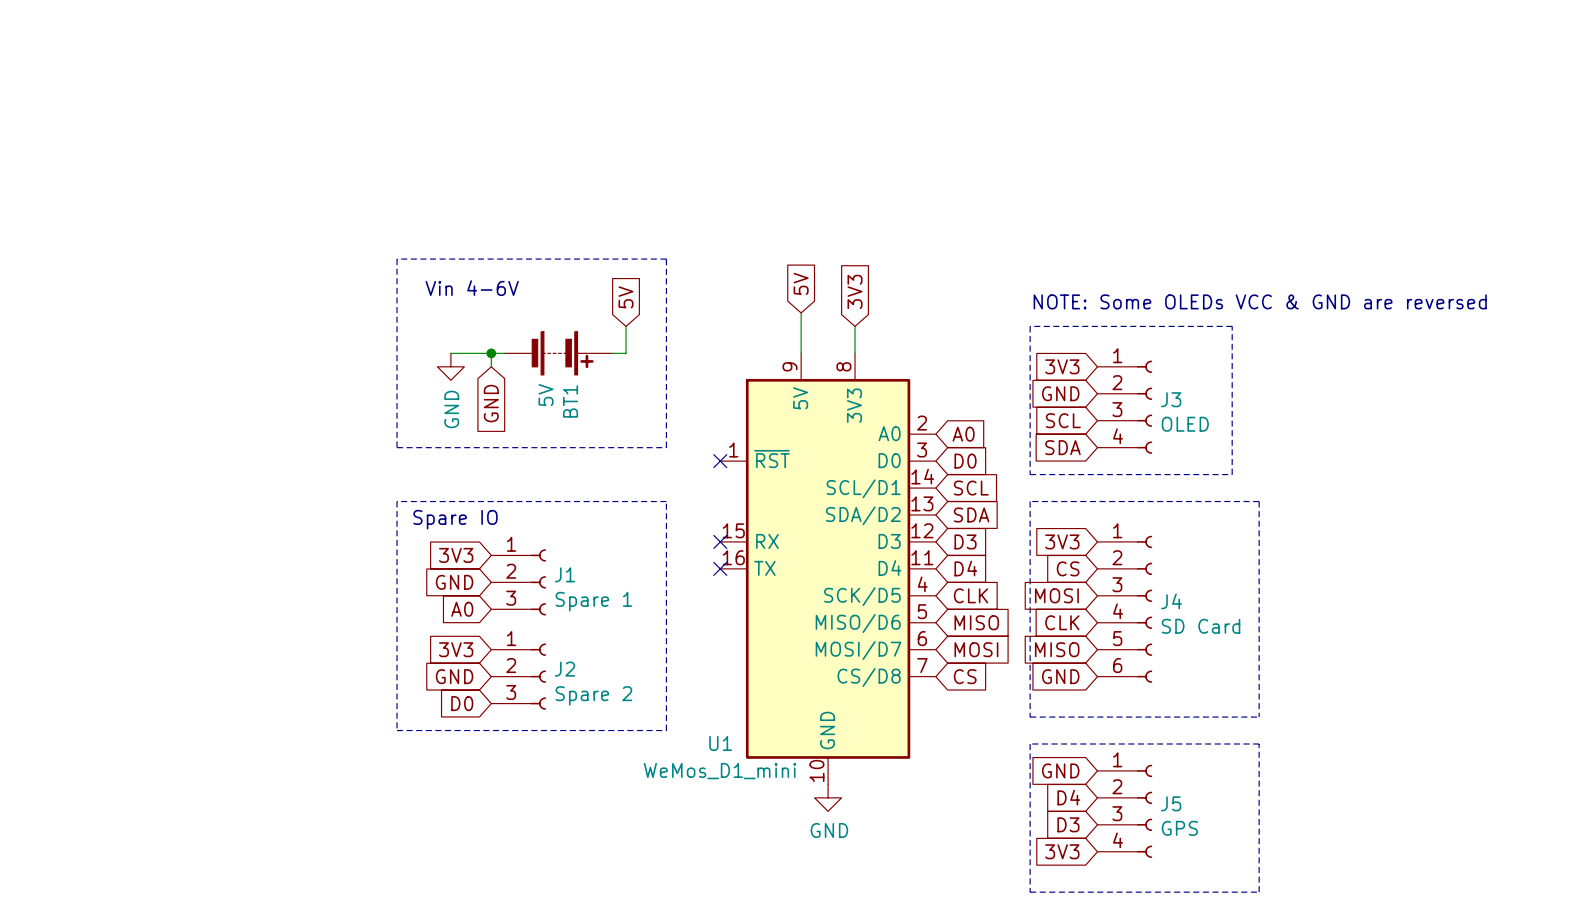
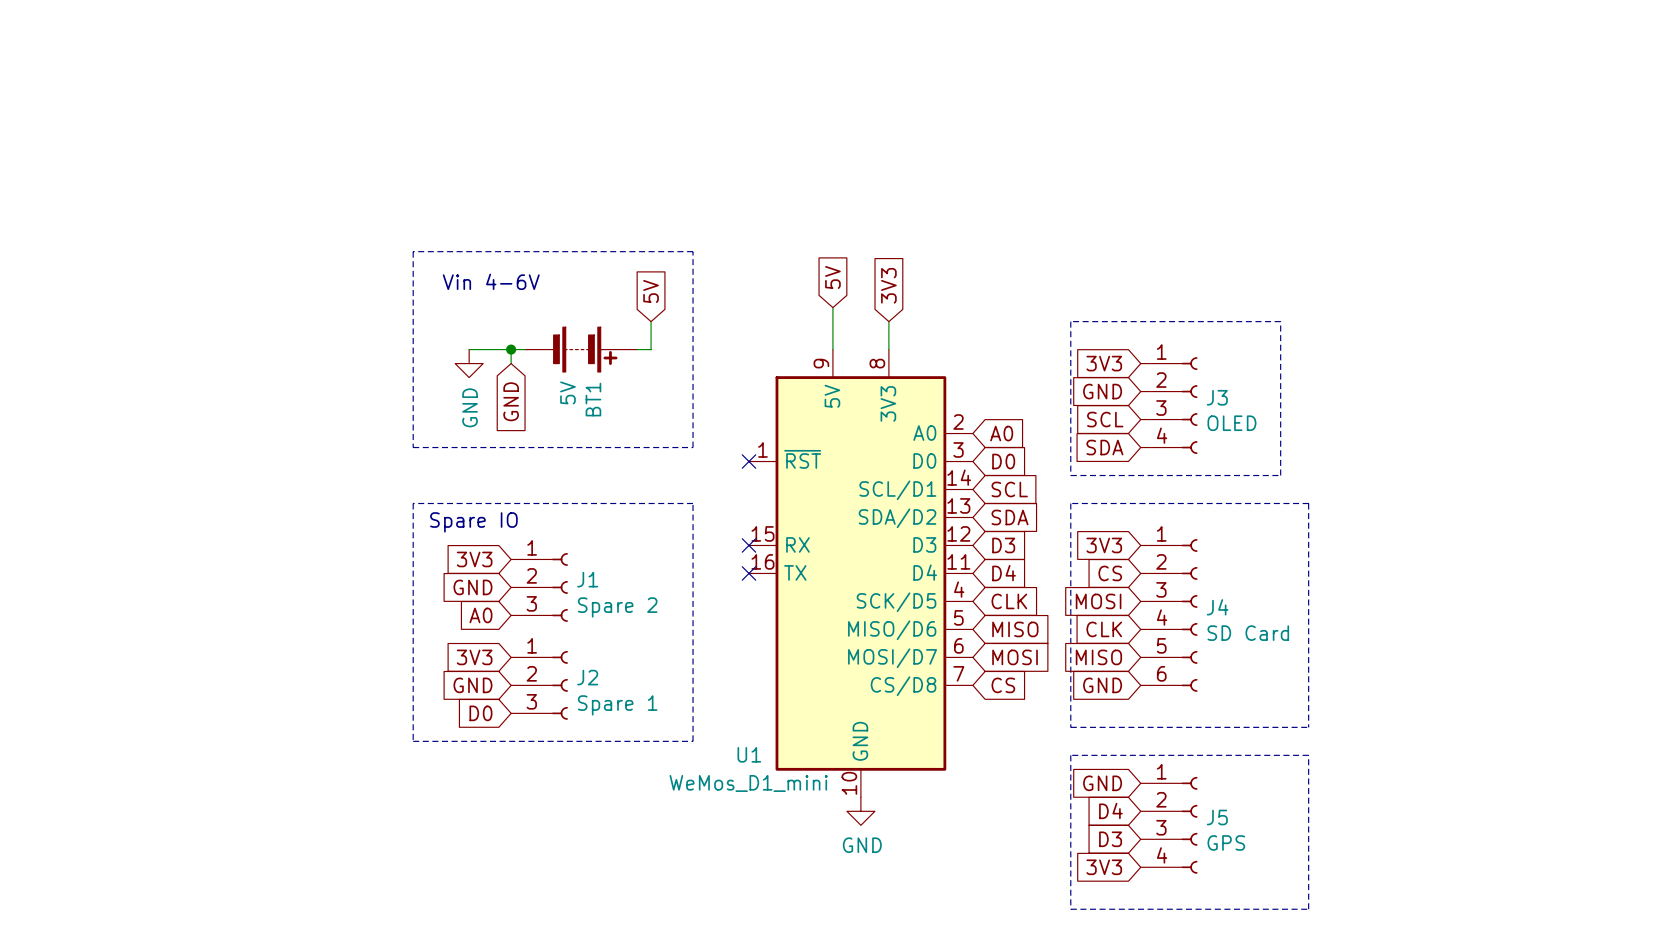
text: NOTE: Some OLEDs VCC & GND are reversed (1260, 301) -> none
J1 value: Spare 1 (593, 601) -> Spare 2 (617, 607)
J2 value: Spare 2 (593, 695) -> Spare 1 (617, 705)

